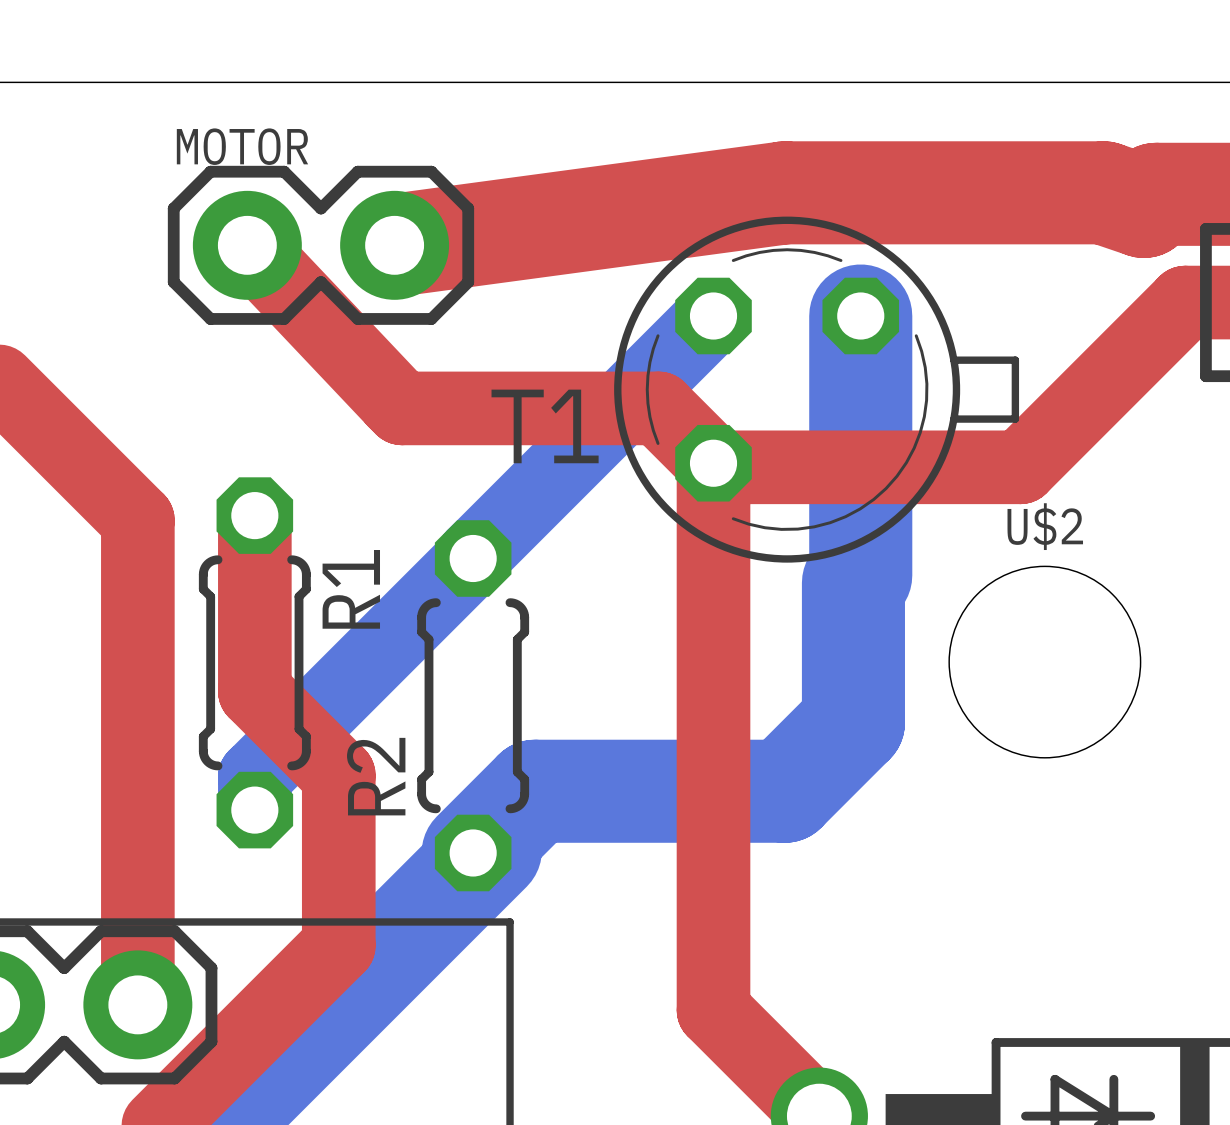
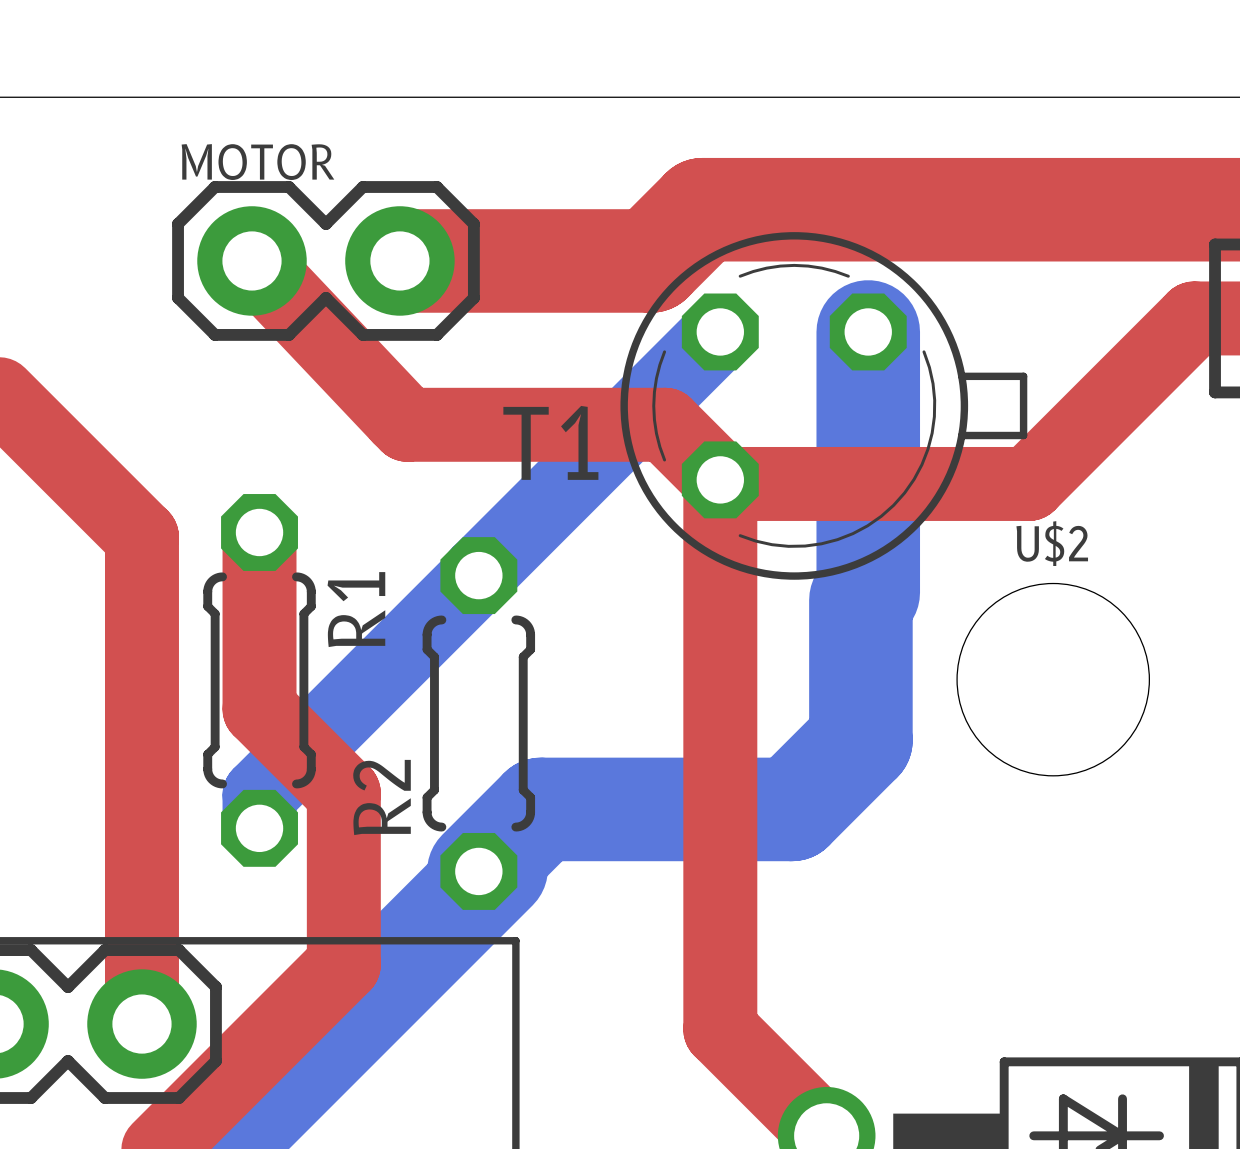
top track: (1156, 194) (1143, 206) (1103, 192) (784, 192) (394, 245) -> (1164, 209) (702, 209) (651, 260) (399, 260)

